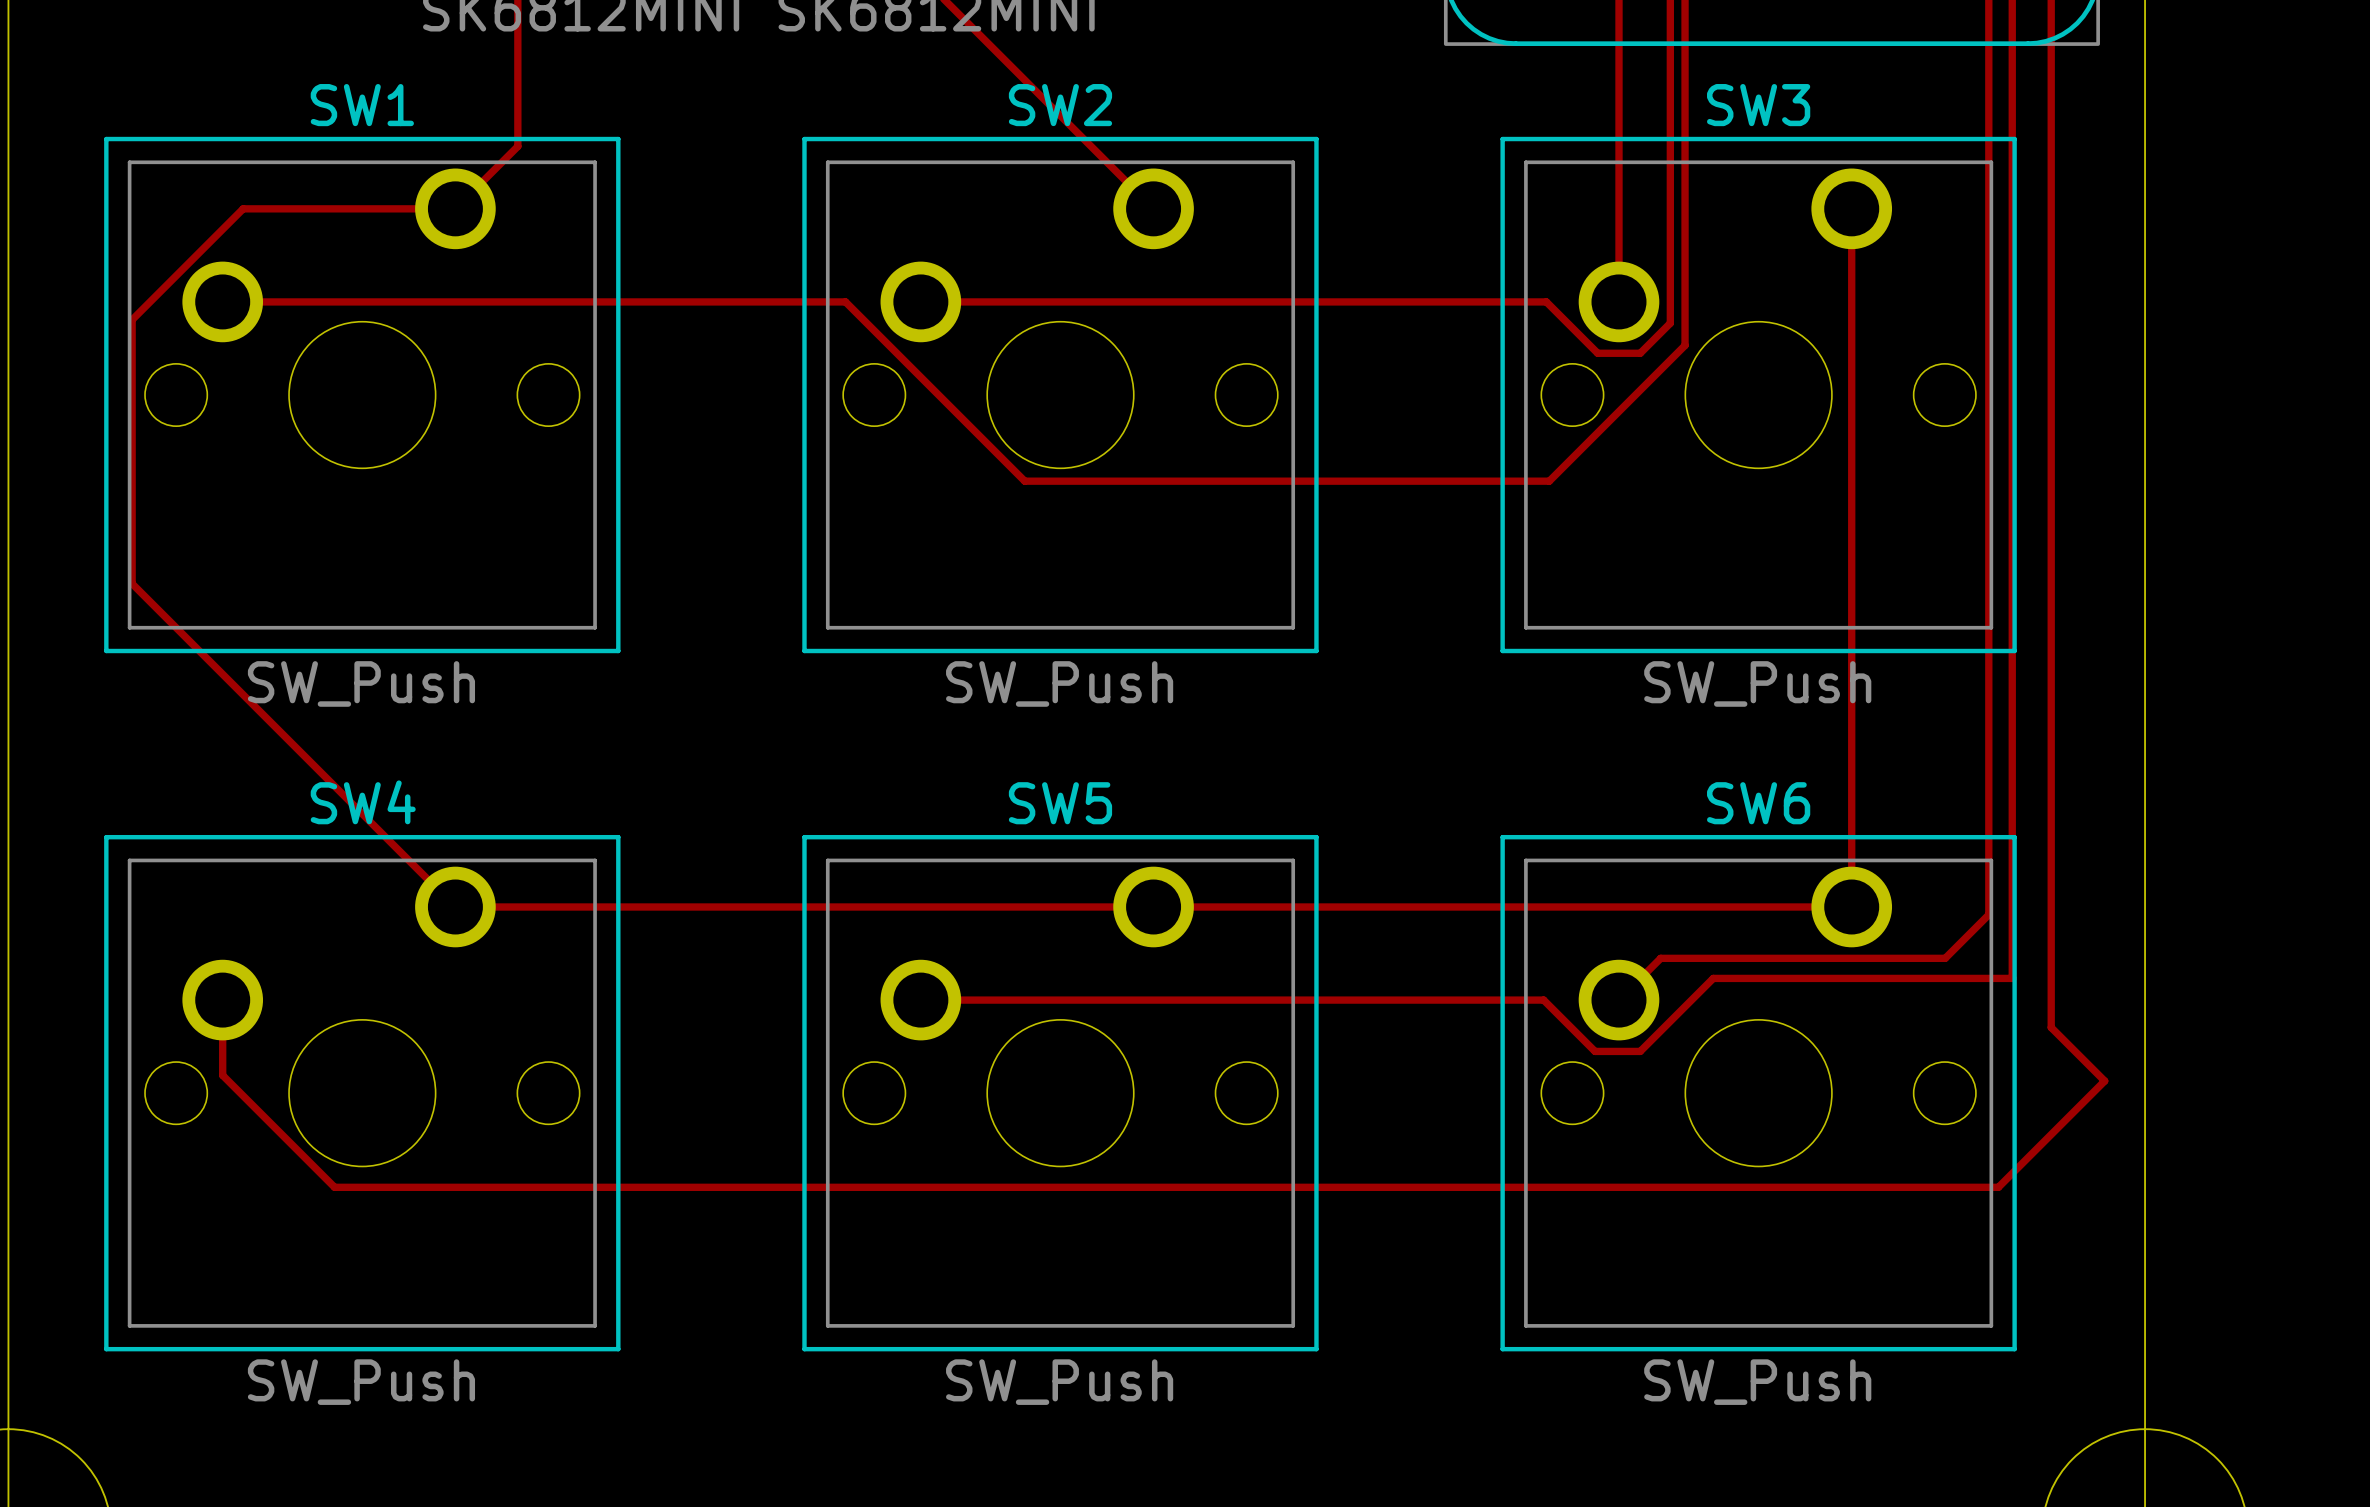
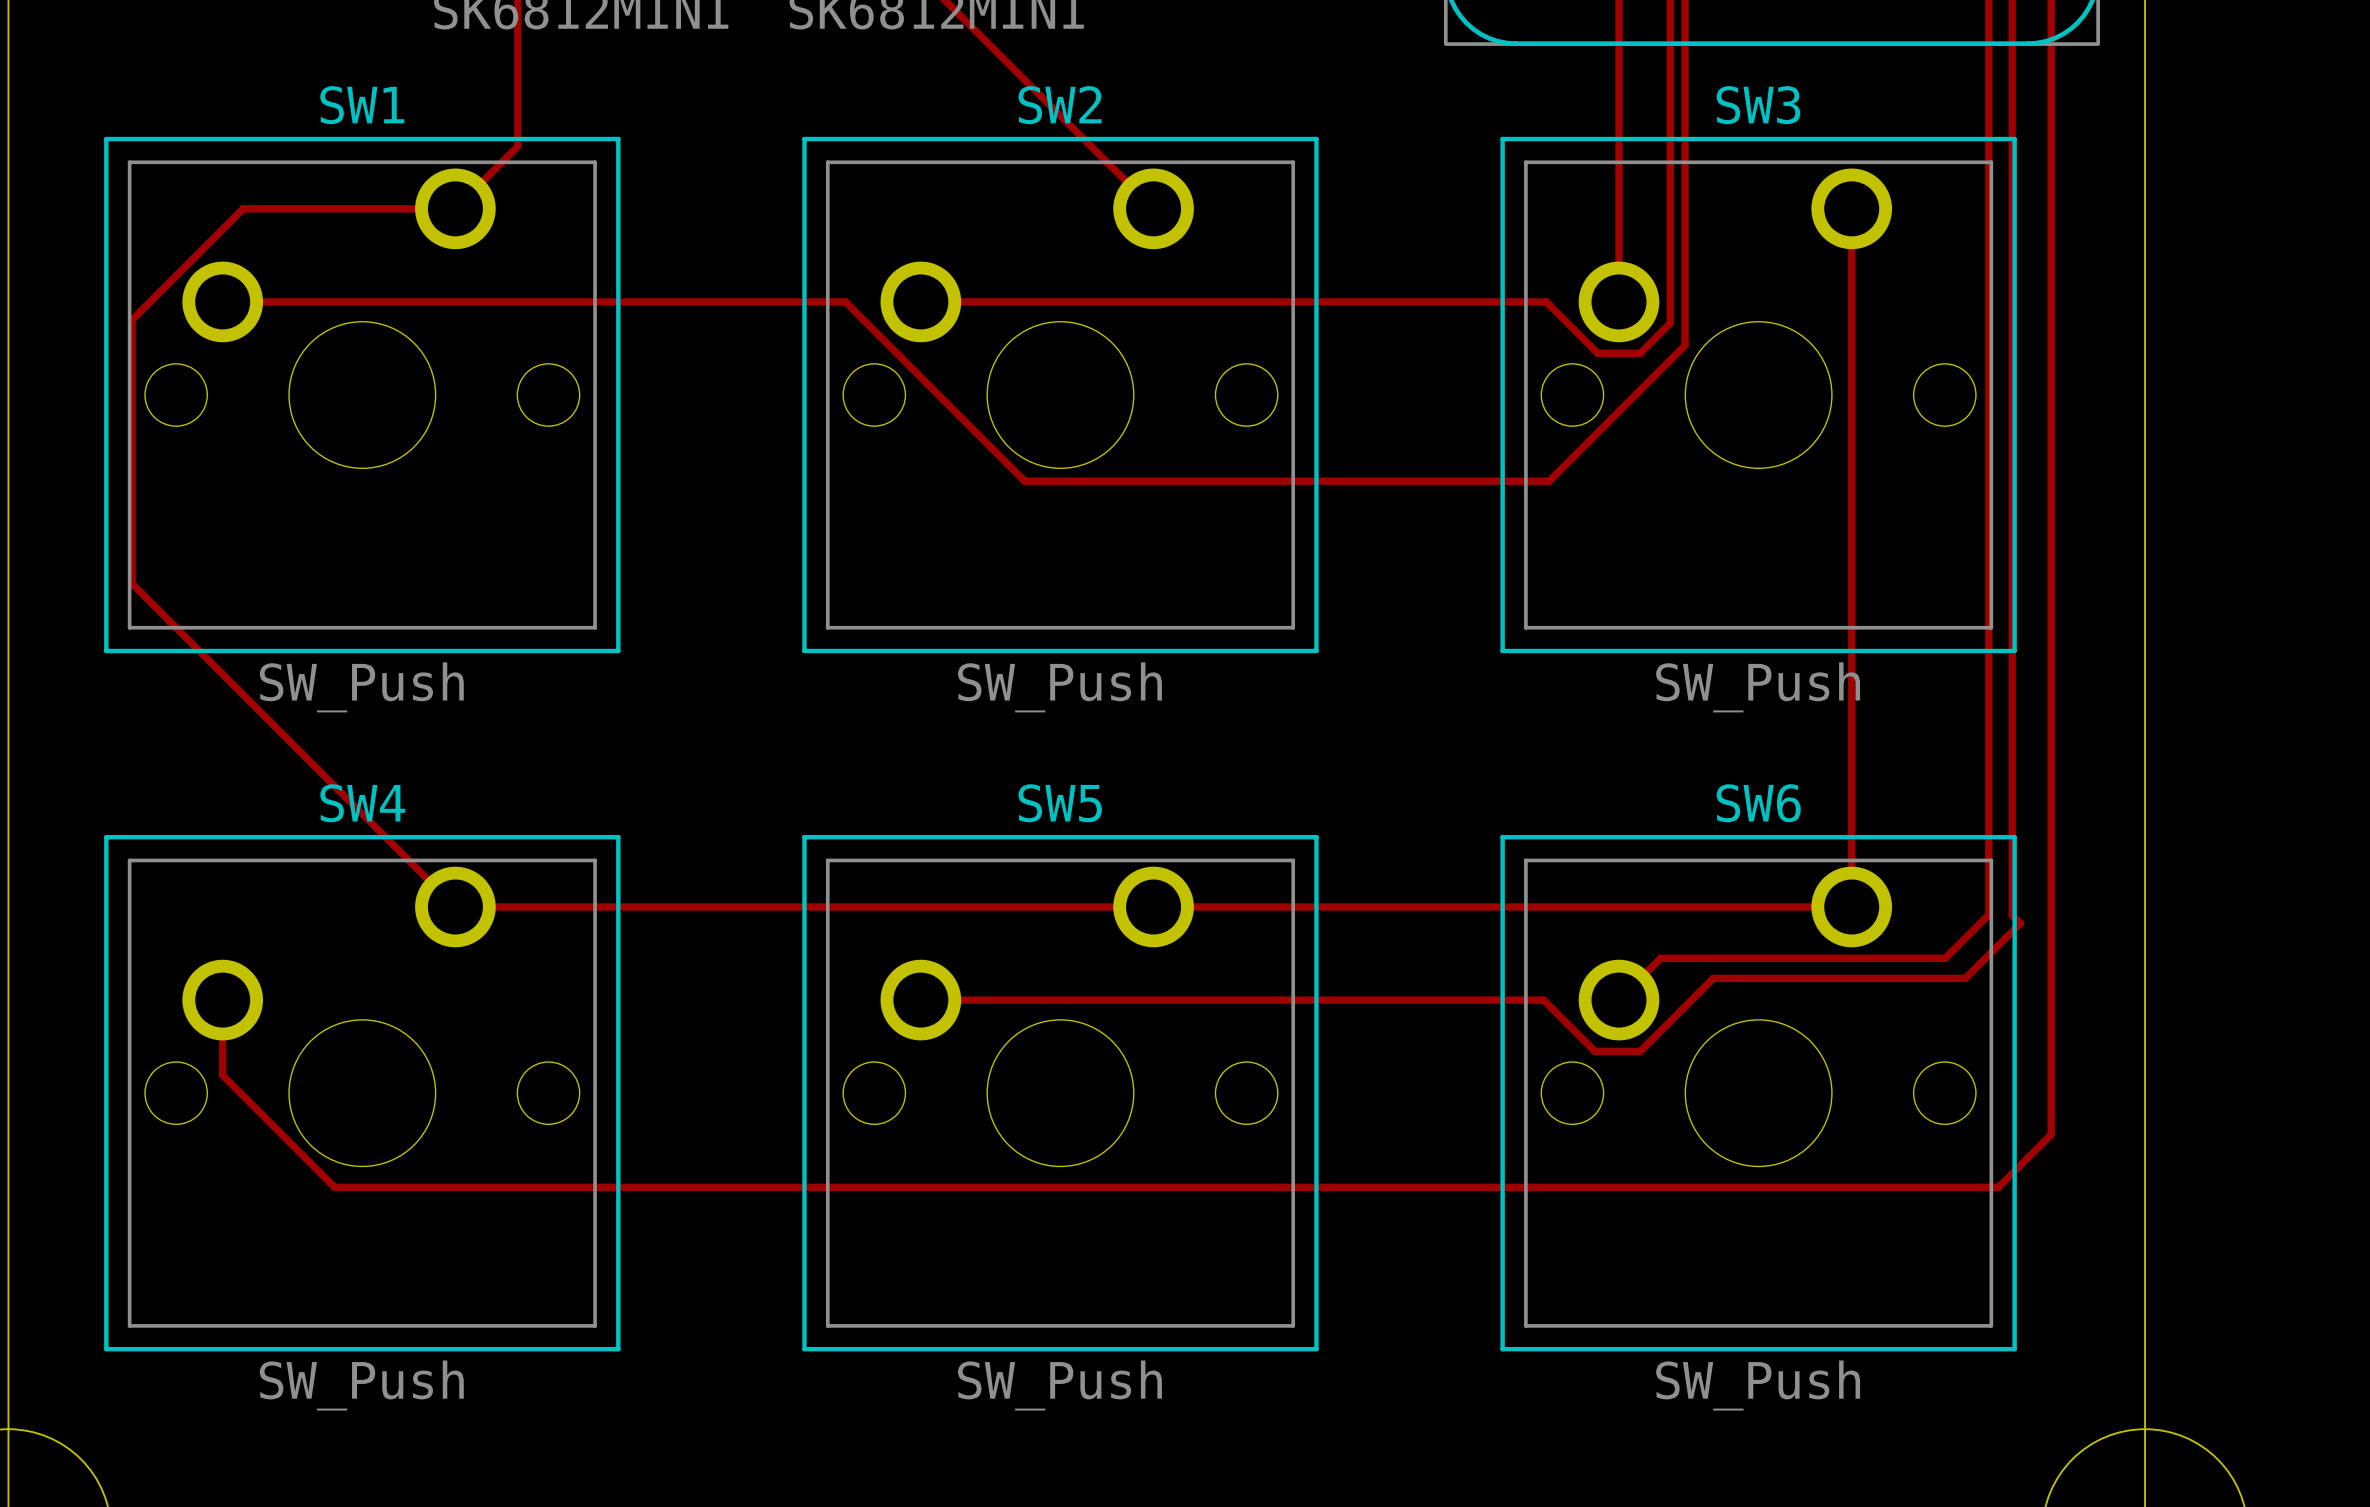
track: (2012, 915) (2013, 978) (1965, 978) -> (2012, 915) (2020, 923) (1965, 978)
track: (2051, 1027) (2104, 1081) (2051, 1134) -> (2051, 1027) (2051, 1134)

